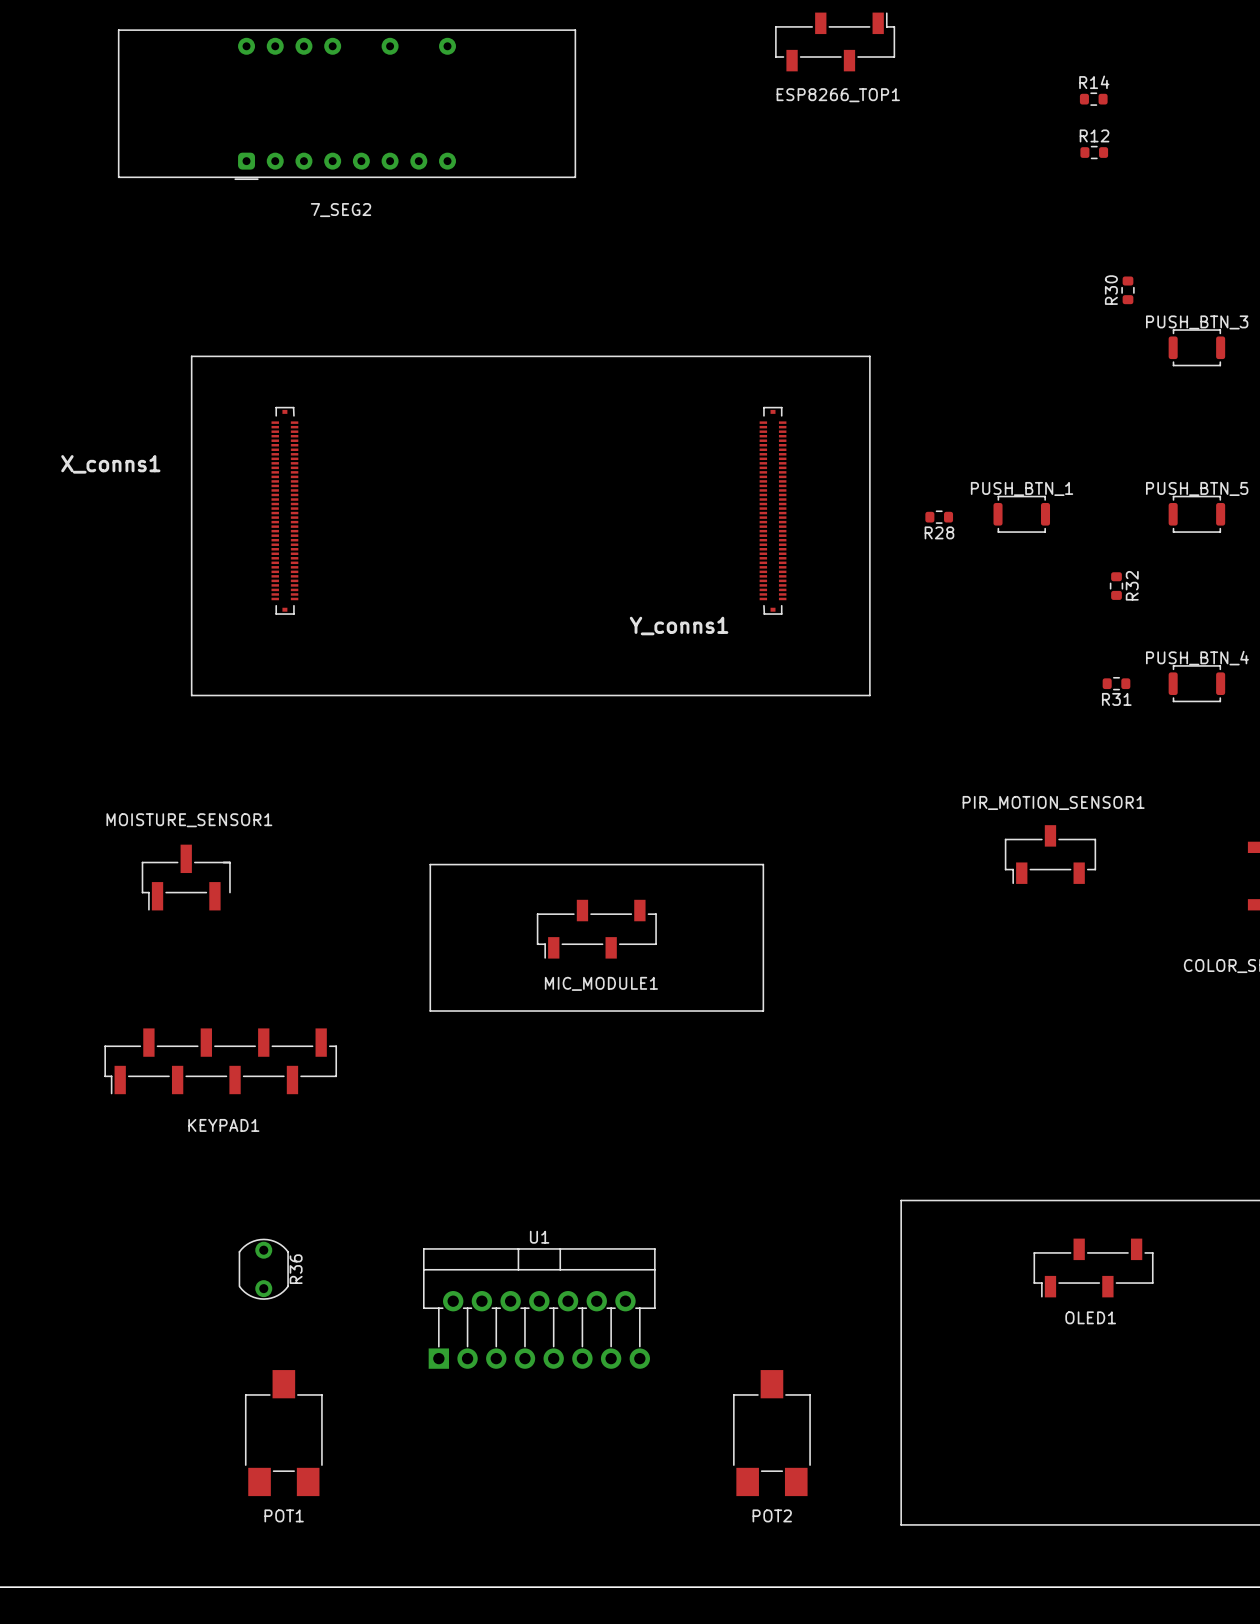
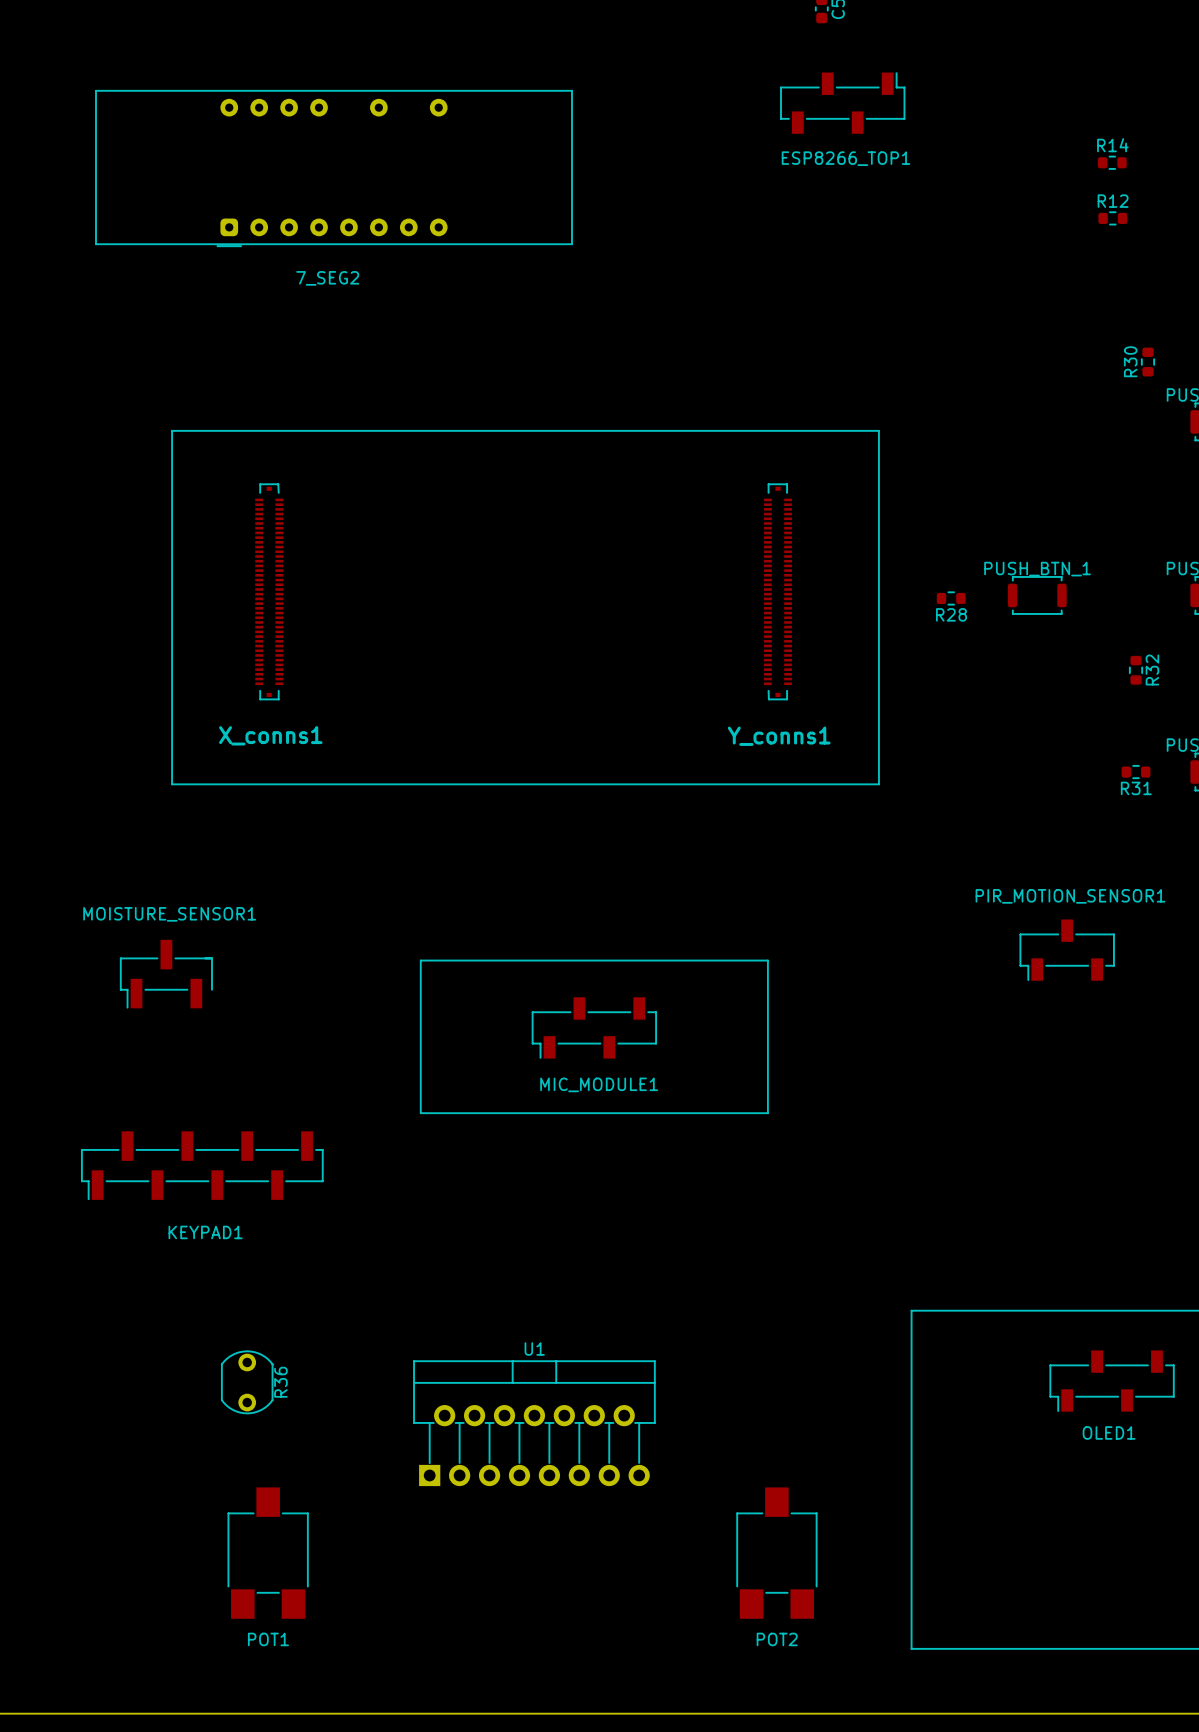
X_conns1 name position: X_conns1 (110, 464) -> X_conns1 (270, 735)
Y_conns1 name position: Y_conns1 (679, 626) -> Y_conns1 (779, 736)

